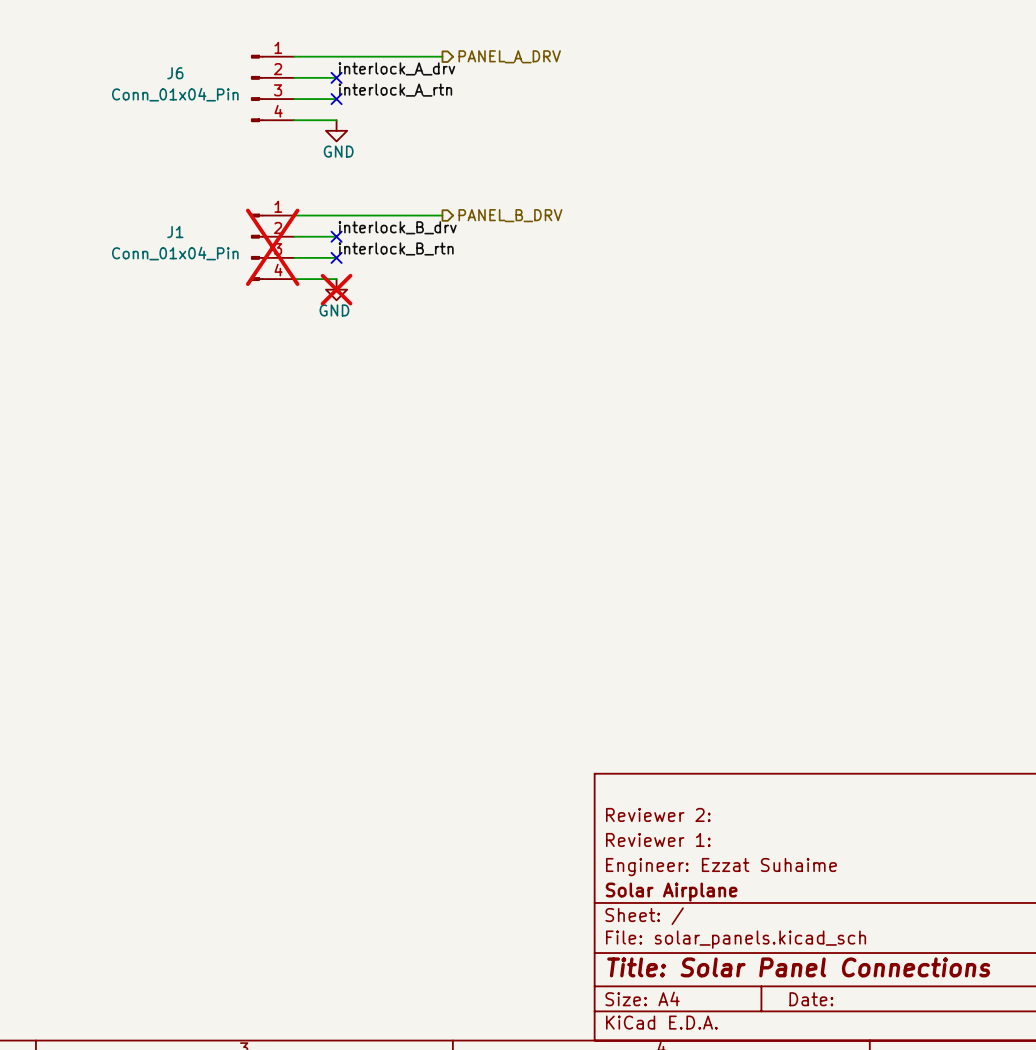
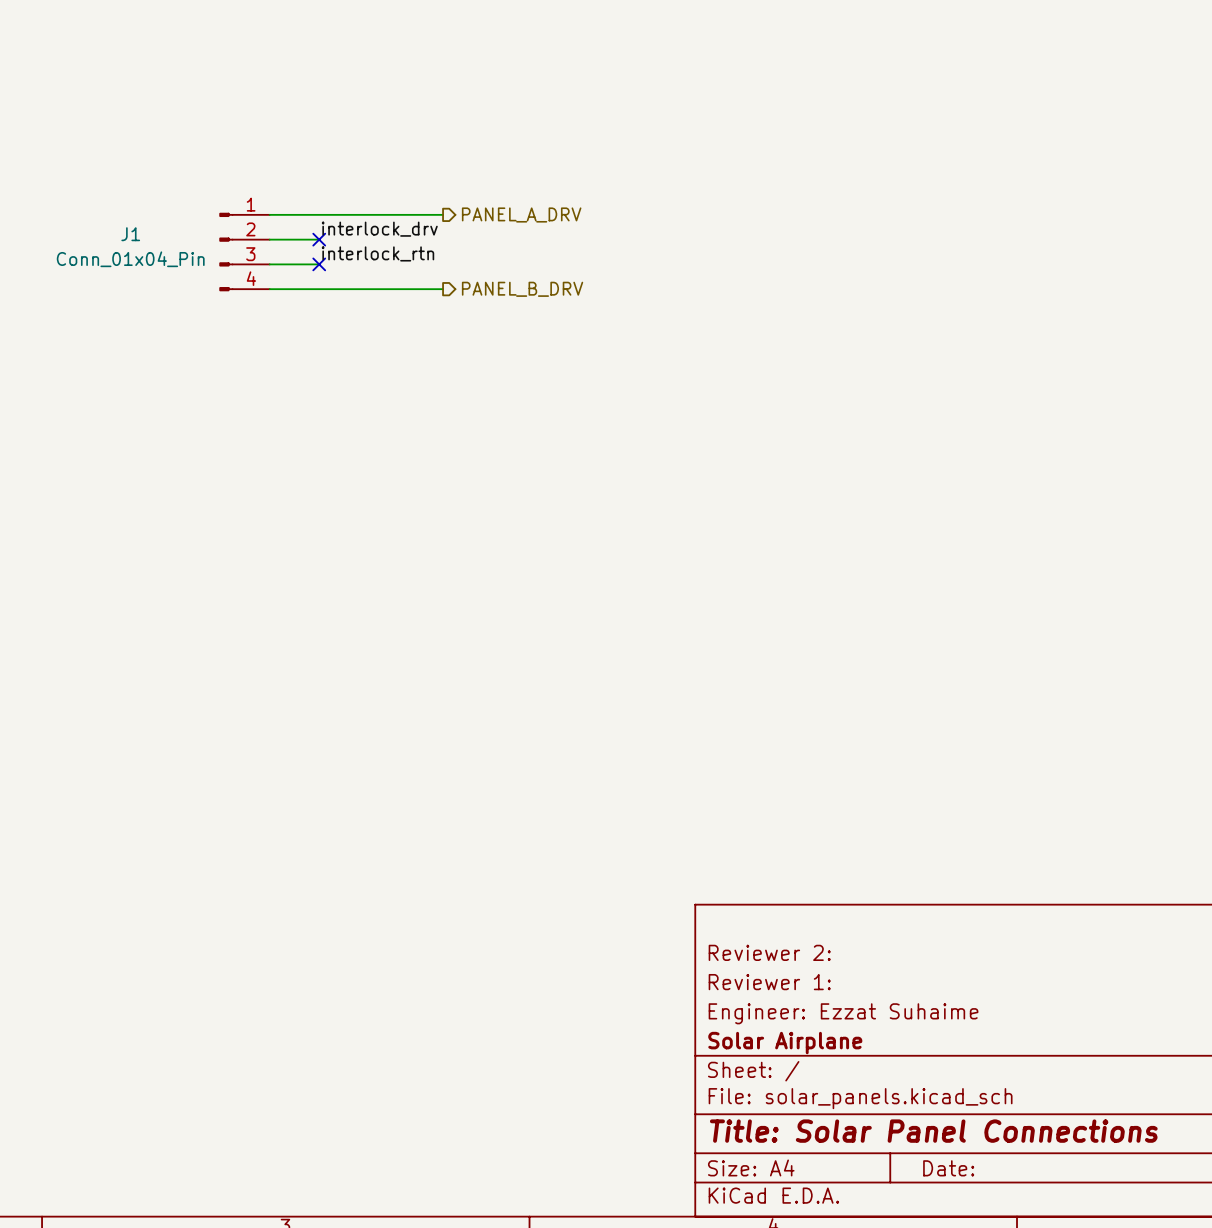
wire: (294, 56) (442, 56) -> (269, 289) (443, 289)
hierarchical label position: PANEL_A_DRV (509, 56) -> PANEL_A_DRV (521, 215)
label: interlock_A_drv (396, 68) -> none
wire: (294, 77) (336, 77) -> none
no-connect mark: (336, 77) -> none
J6: Conn_01x04_Pin (272, 88) -> none
label: interlock_A_rtn (395, 90) -> none
wire: (294, 99) (336, 99) -> none
no-connect mark: (336, 99) -> none
wire: (294, 120) (336, 120) -> none
power symbol: GND (336, 130) -> none
label: none -> interlock_drv (379, 229)
no-connect mark: none -> (319, 239)
wire: (294, 215) (442, 215) -> (269, 214) (443, 214)
hierarchical label position: PANEL_B_DRV (510, 215) -> PANEL_B_DRV (522, 289)
no-connect mark: none -> (319, 264)
label: interlock_B_drv (397, 227) -> interlock_rtn (377, 253)
wire: (294, 236) (336, 236) -> (269, 239) (319, 239)
no-connect mark: (336, 236) -> none
J1 position: (272, 247) -> (244, 252)
J1 do-not-place cross: (272, 247) -> none
label: interlock_B_rtn (396, 248) -> none
wire: (294, 257) (336, 257) -> (269, 264) (319, 264)
no-connect mark: (336, 257) -> none
wire: (294, 279) (336, 279) -> none
power symbol: GND (336, 289) -> none

